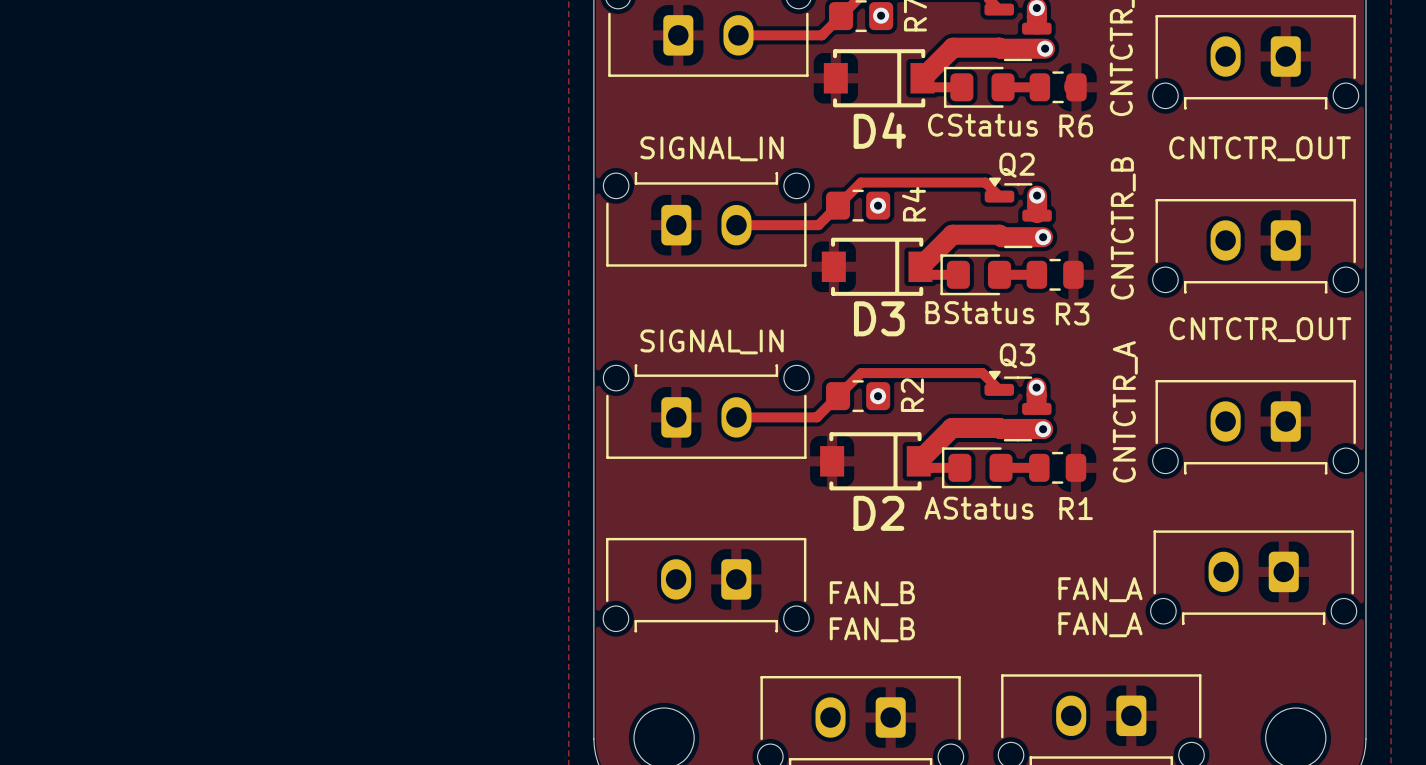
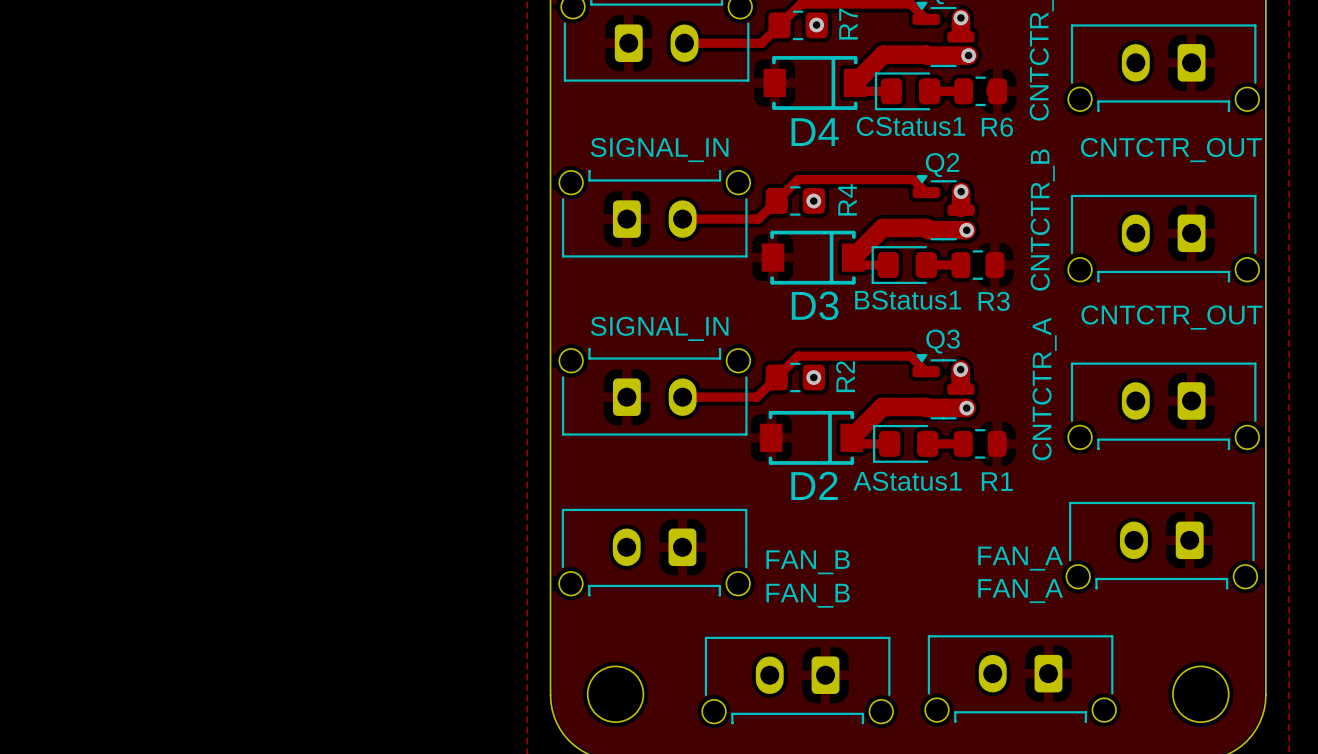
CStatus name: CStatus (982, 125) -> CStatus1 (911, 126)
BStatus name: BStatus (979, 312) -> BStatus1 (908, 300)
AStatus name: AStatus (978, 508) -> AStatus1 (907, 481)

